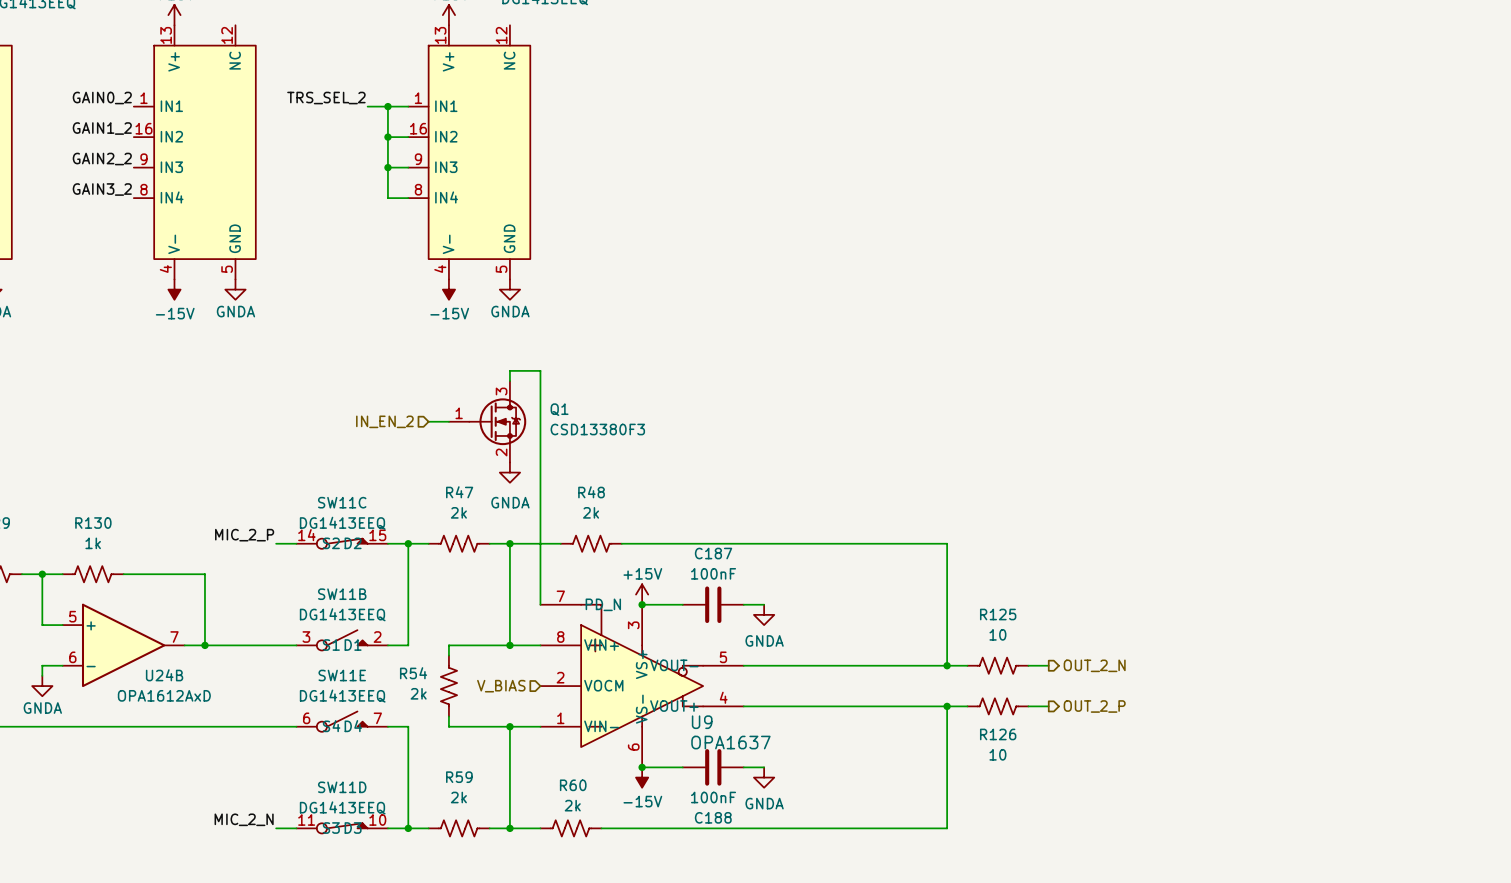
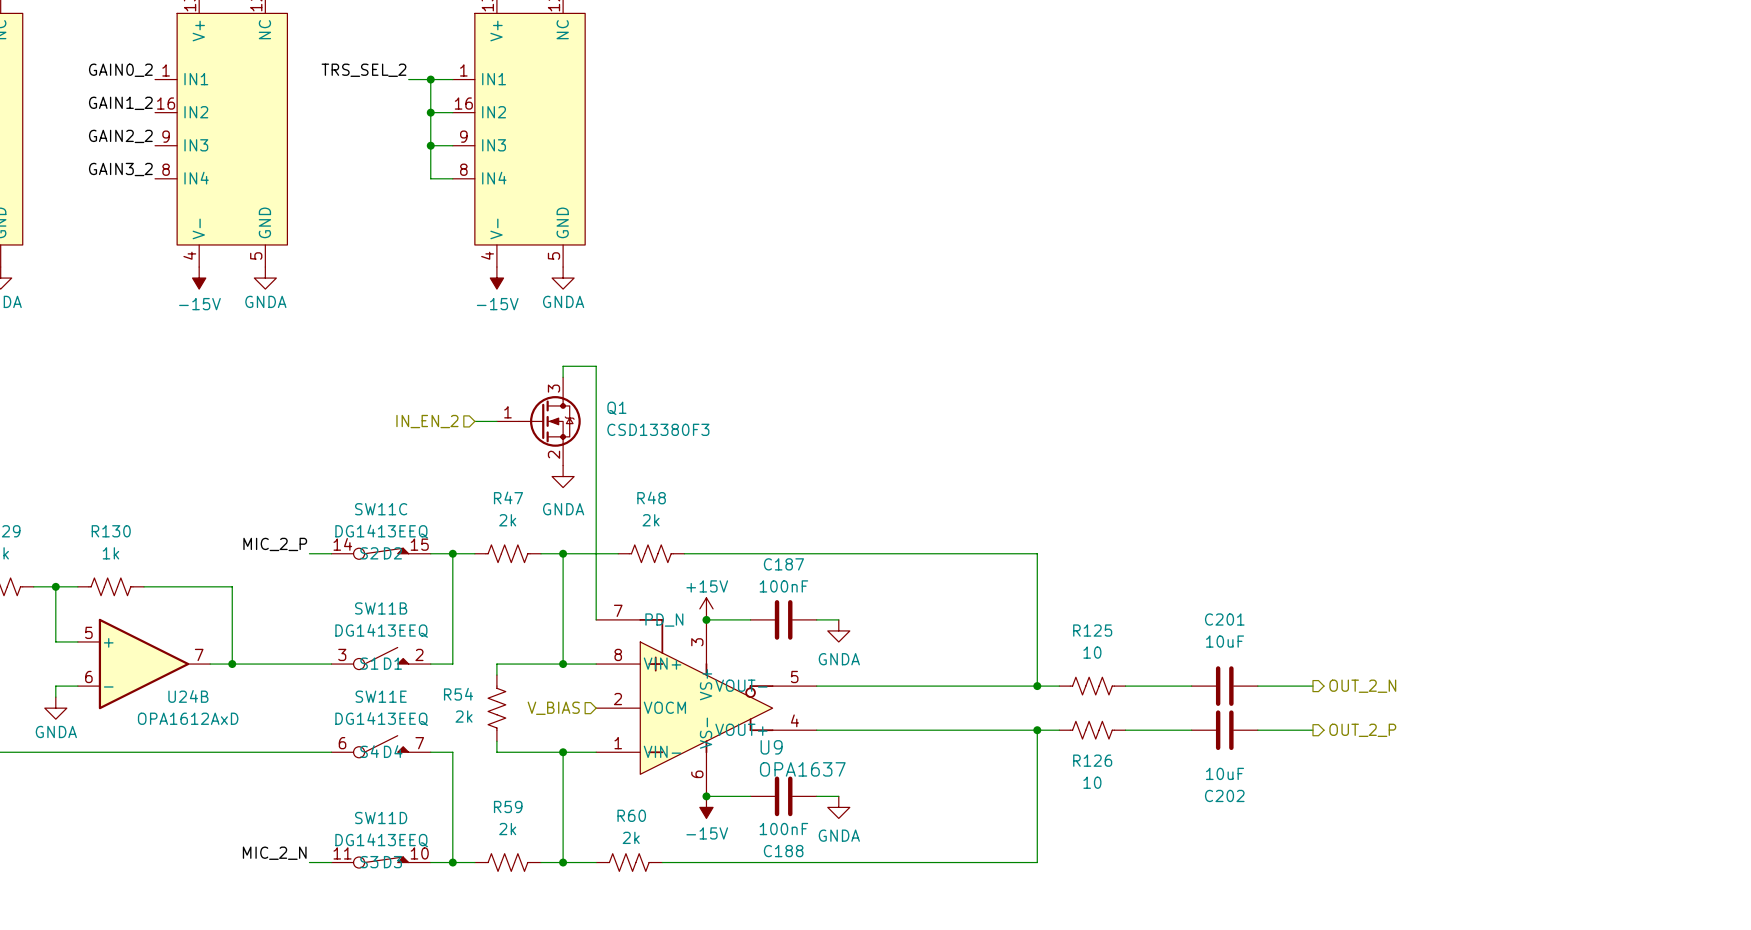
wire: none -> (1147, 686) (1191, 686)
hierarchical label position: OUT_2_N (1094, 665) -> OUT_2_N (1362, 686)
C201: none -> 10uF (1224, 686)
wire: none -> (1257, 686) (1312, 686)
wire: none -> (1147, 730) (1191, 730)
hierarchical label position: OUT_2_P (1094, 706) -> OUT_2_P (1362, 730)
C202: none -> 10uF (1224, 730)
wire: none -> (1257, 730) (1312, 730)

